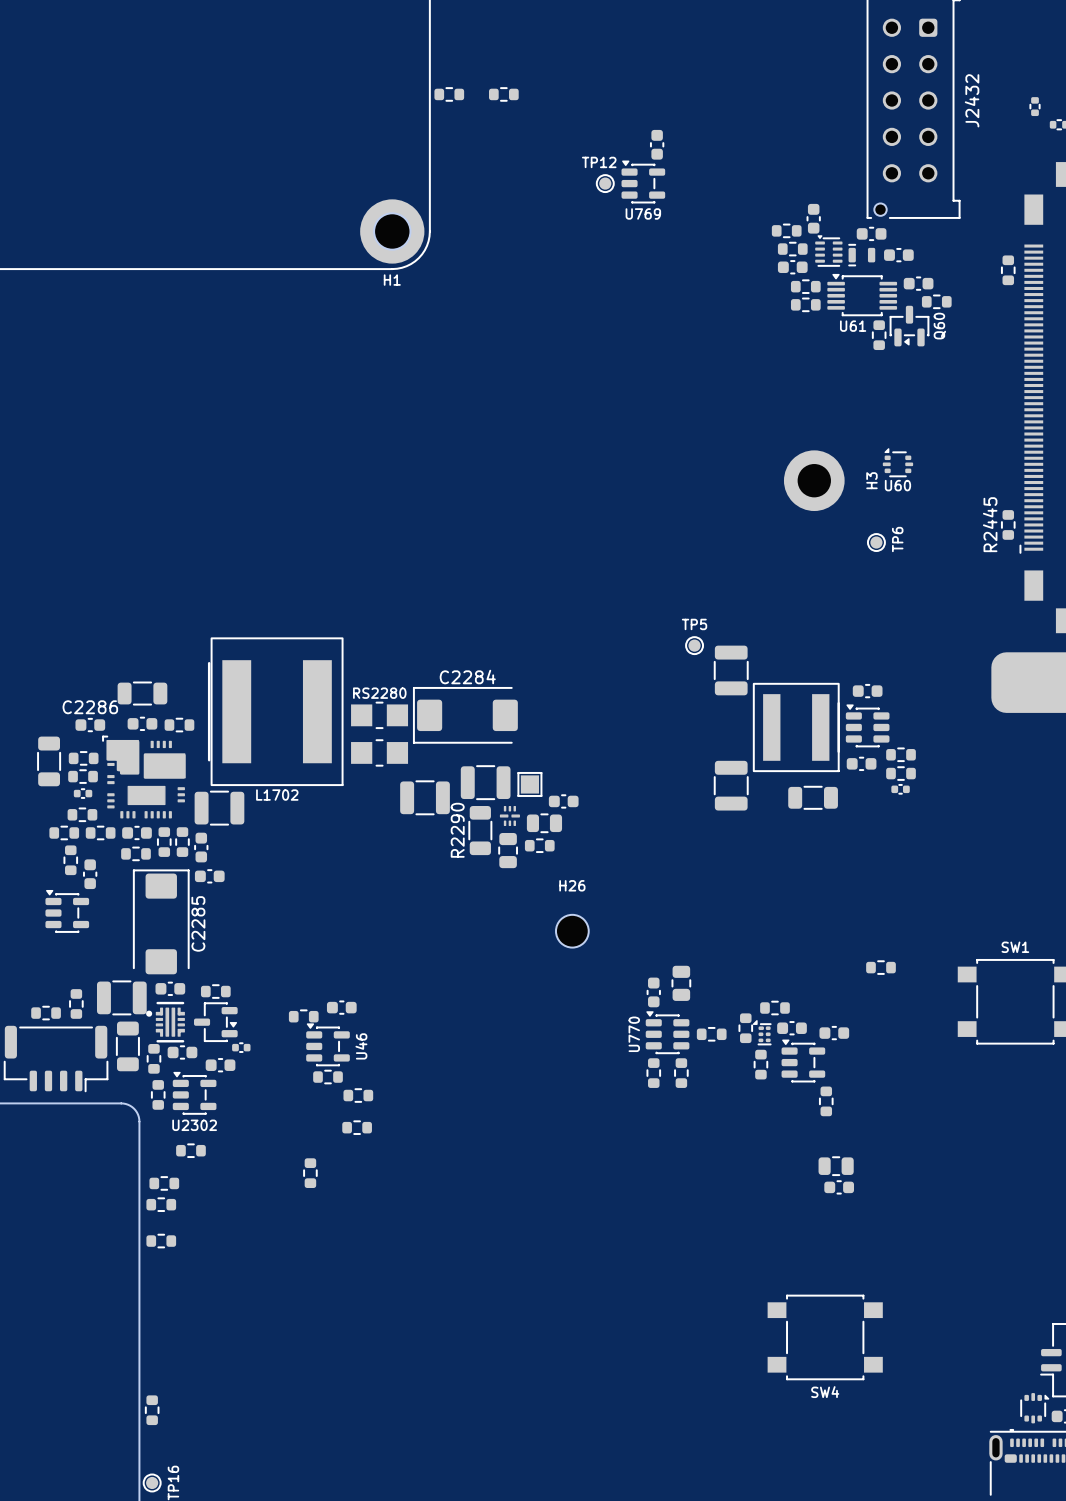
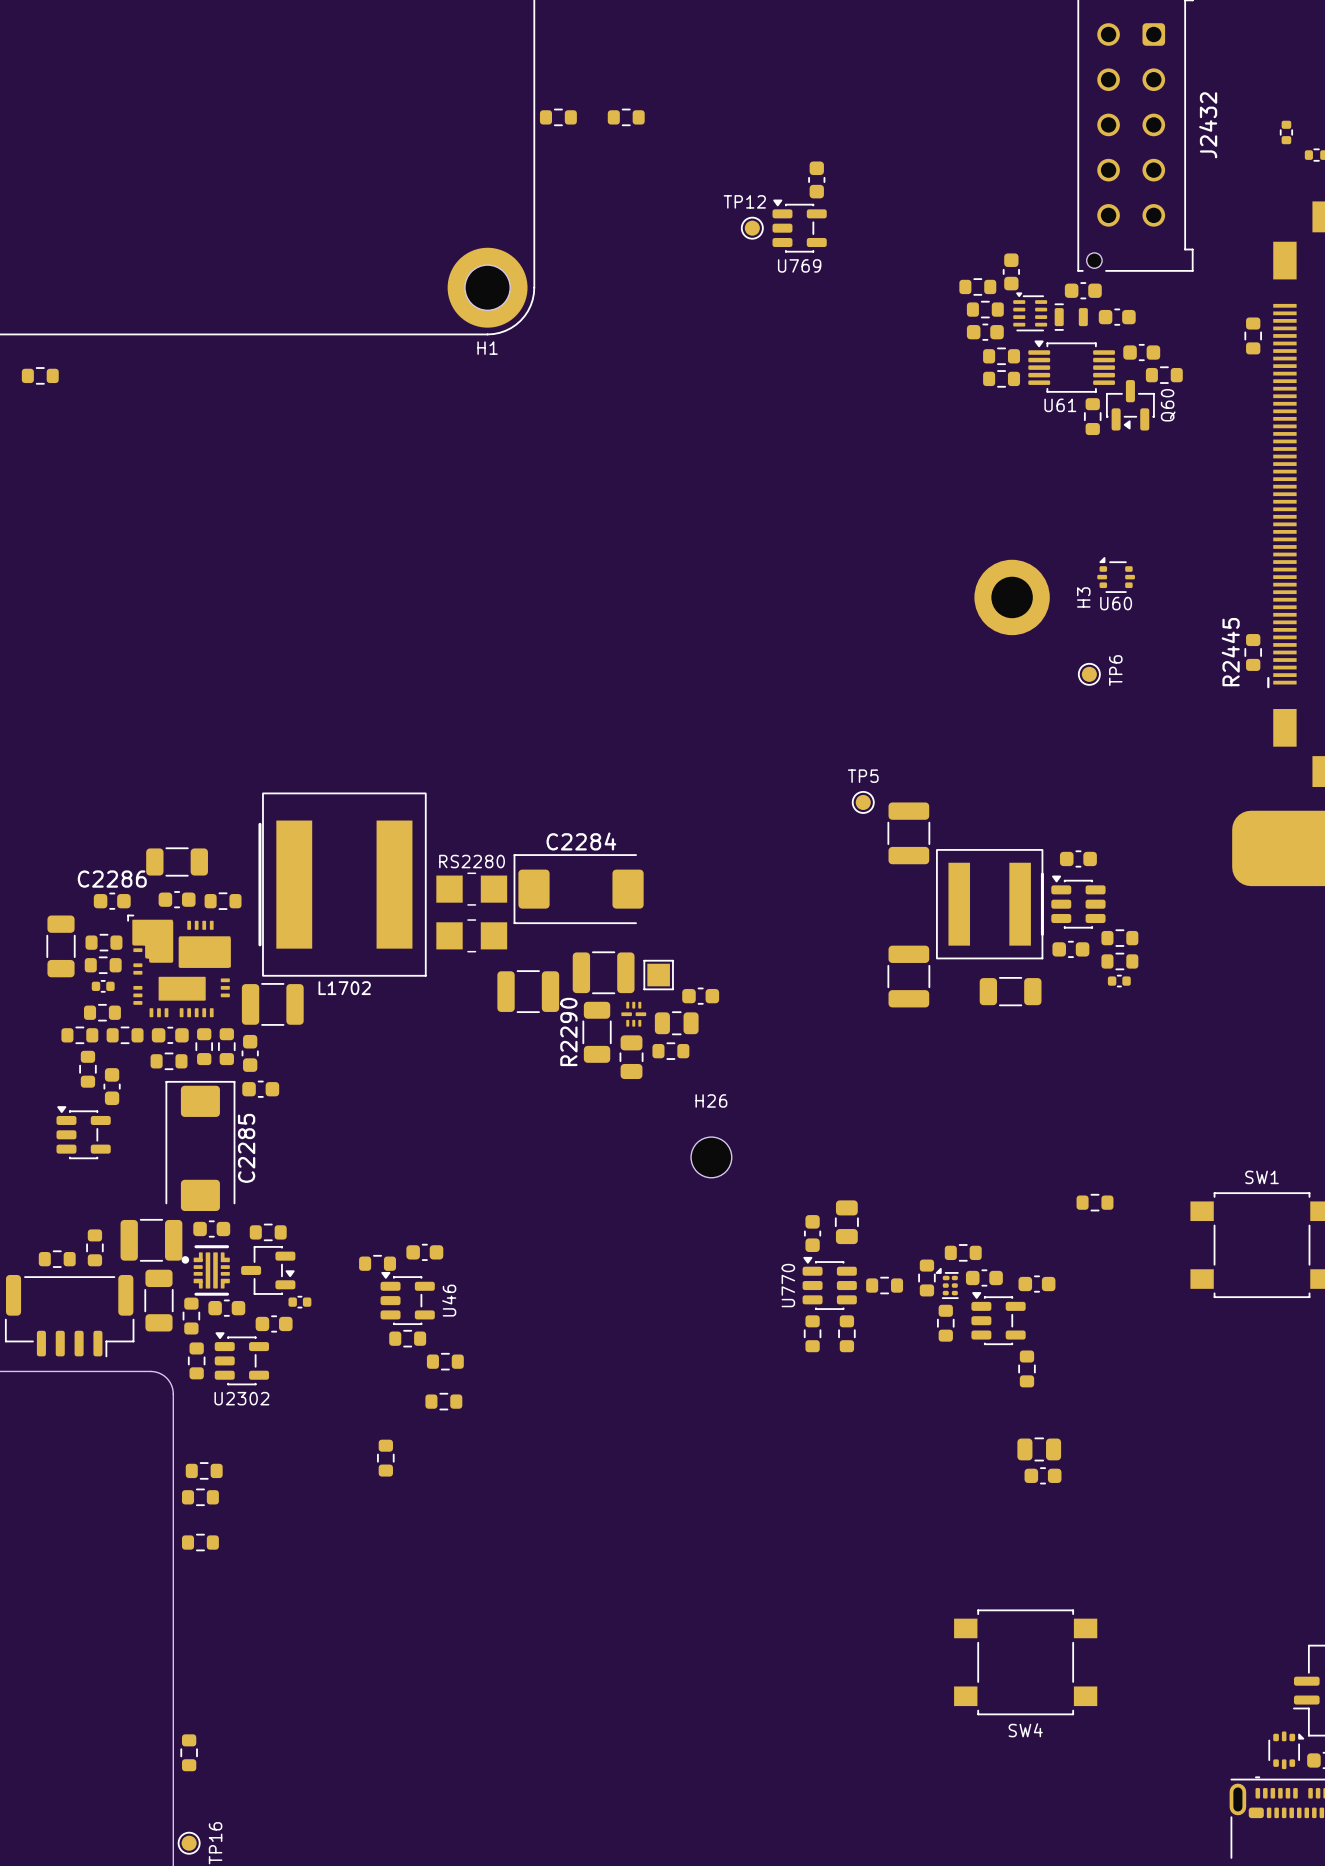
part: none -> (40, 375)
part: (190, 1150) -> none

